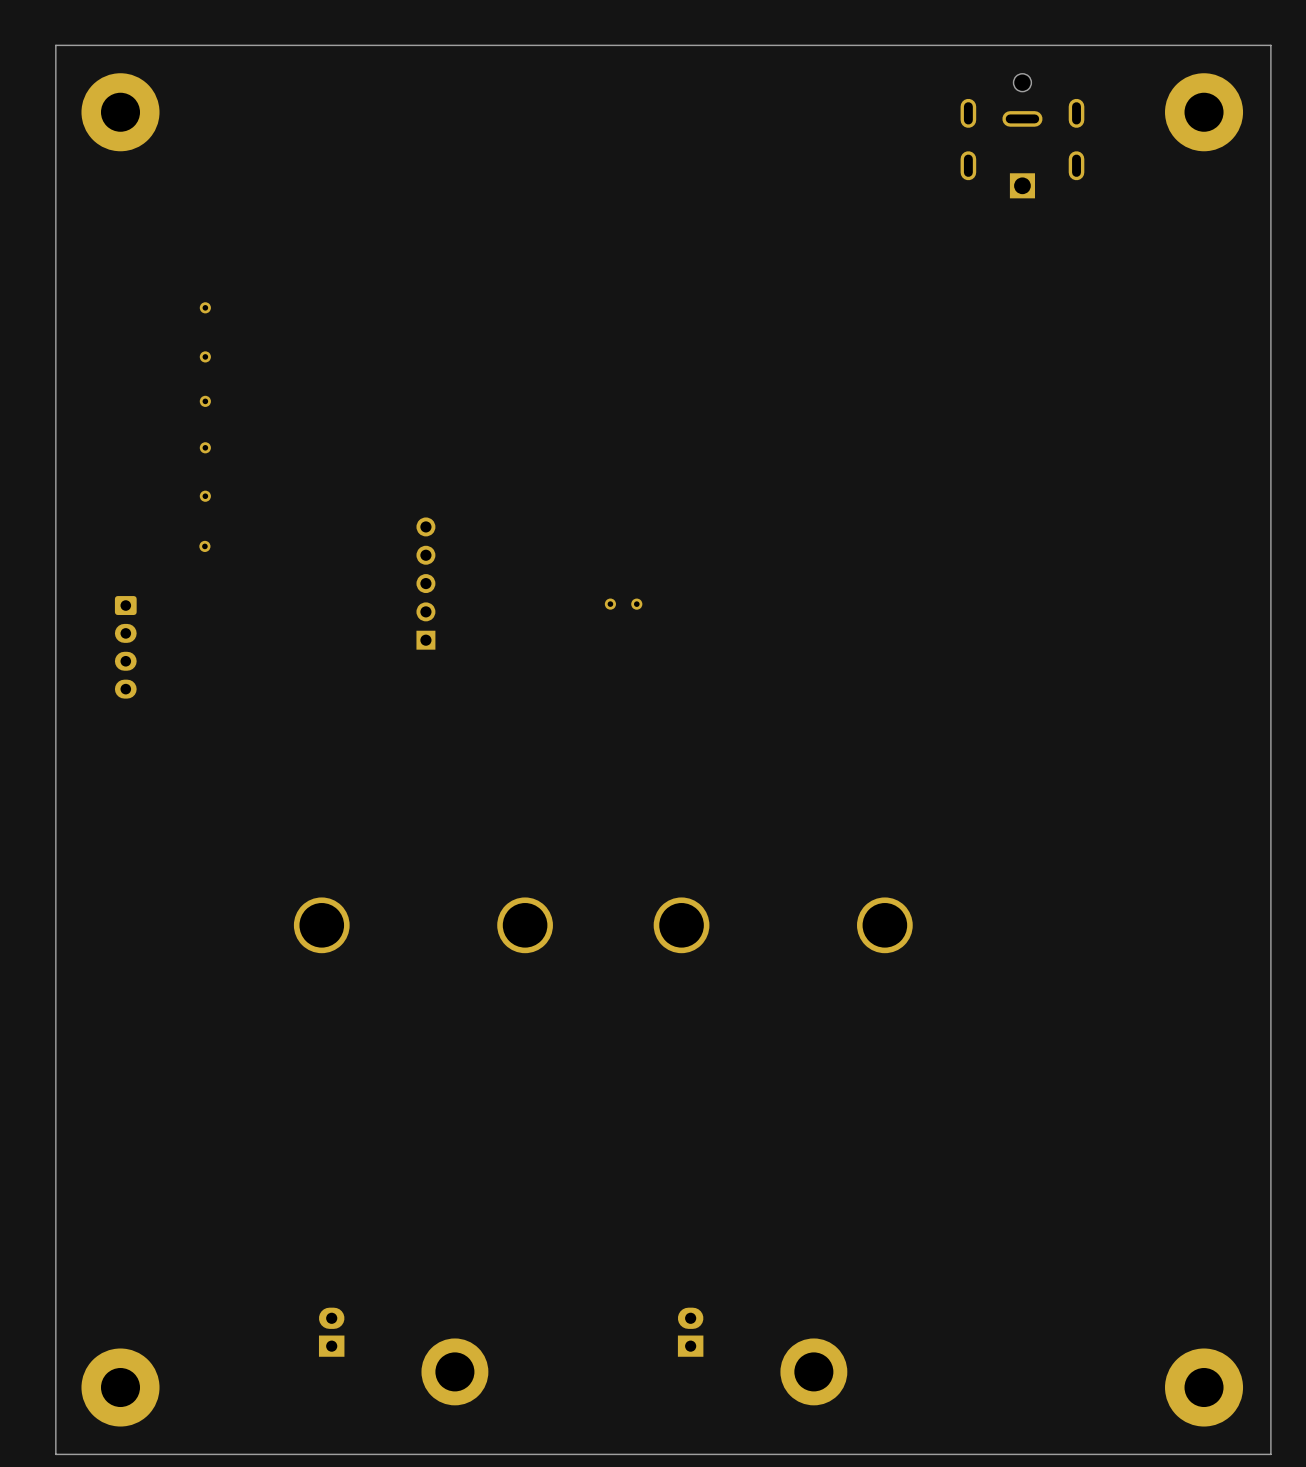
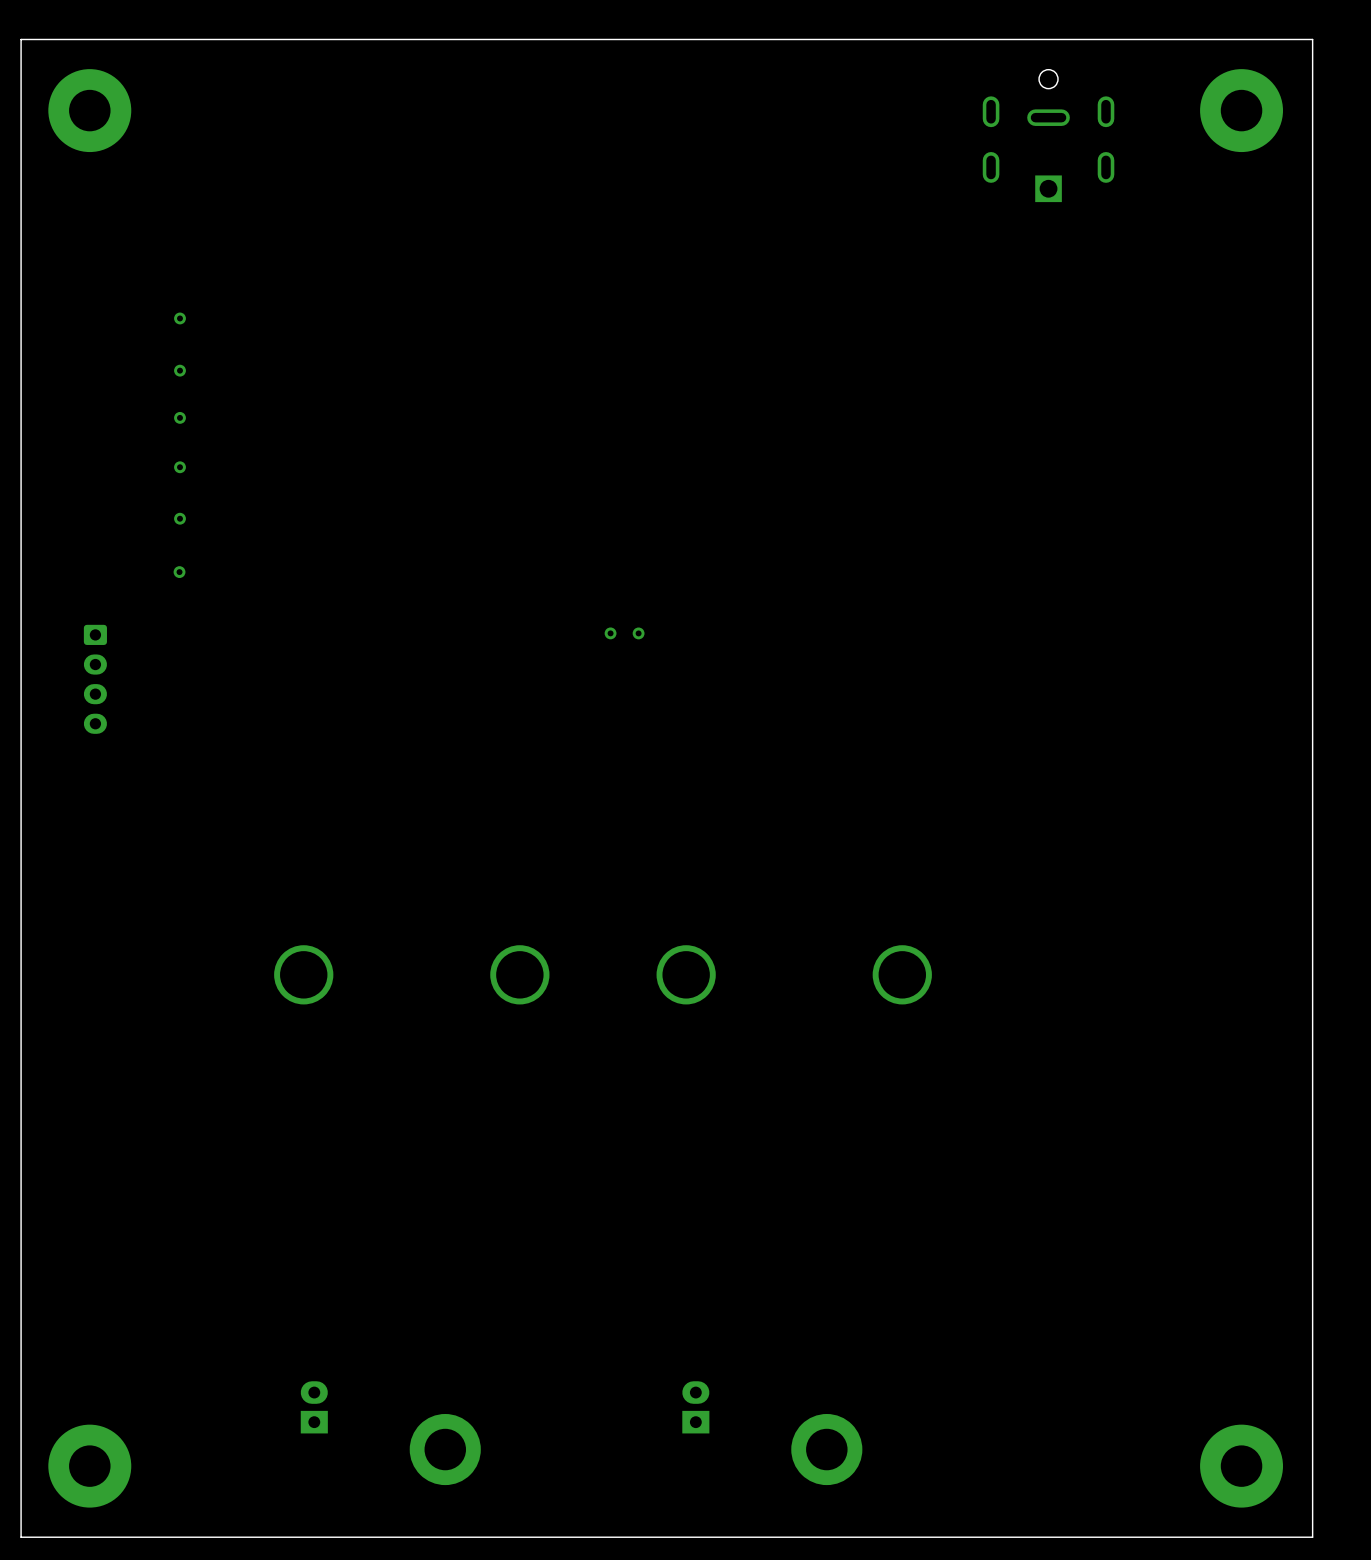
part: (425, 583) -> none

